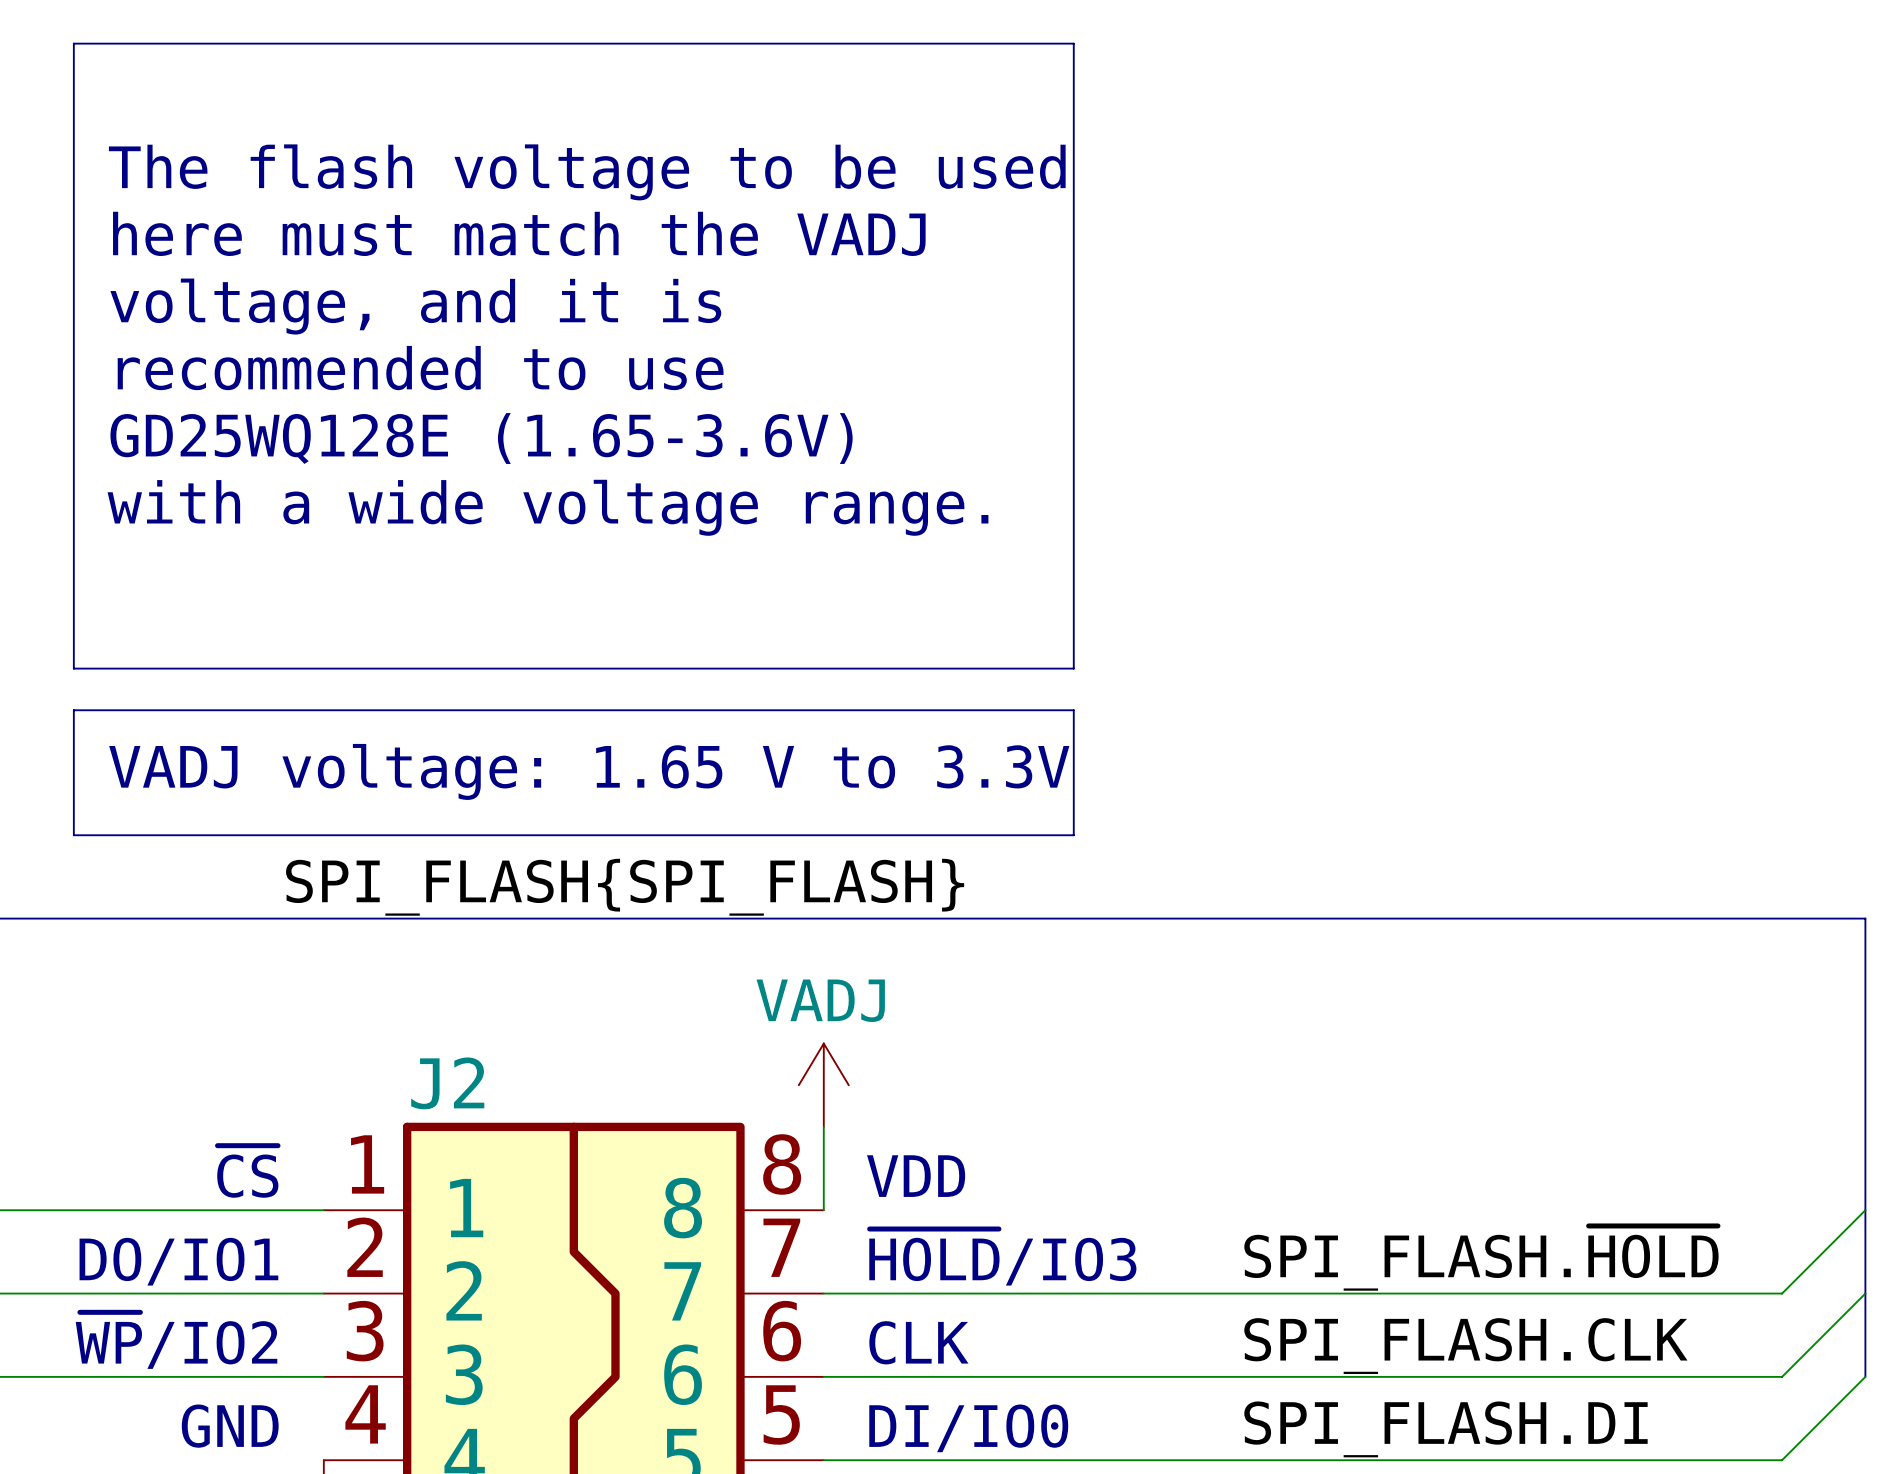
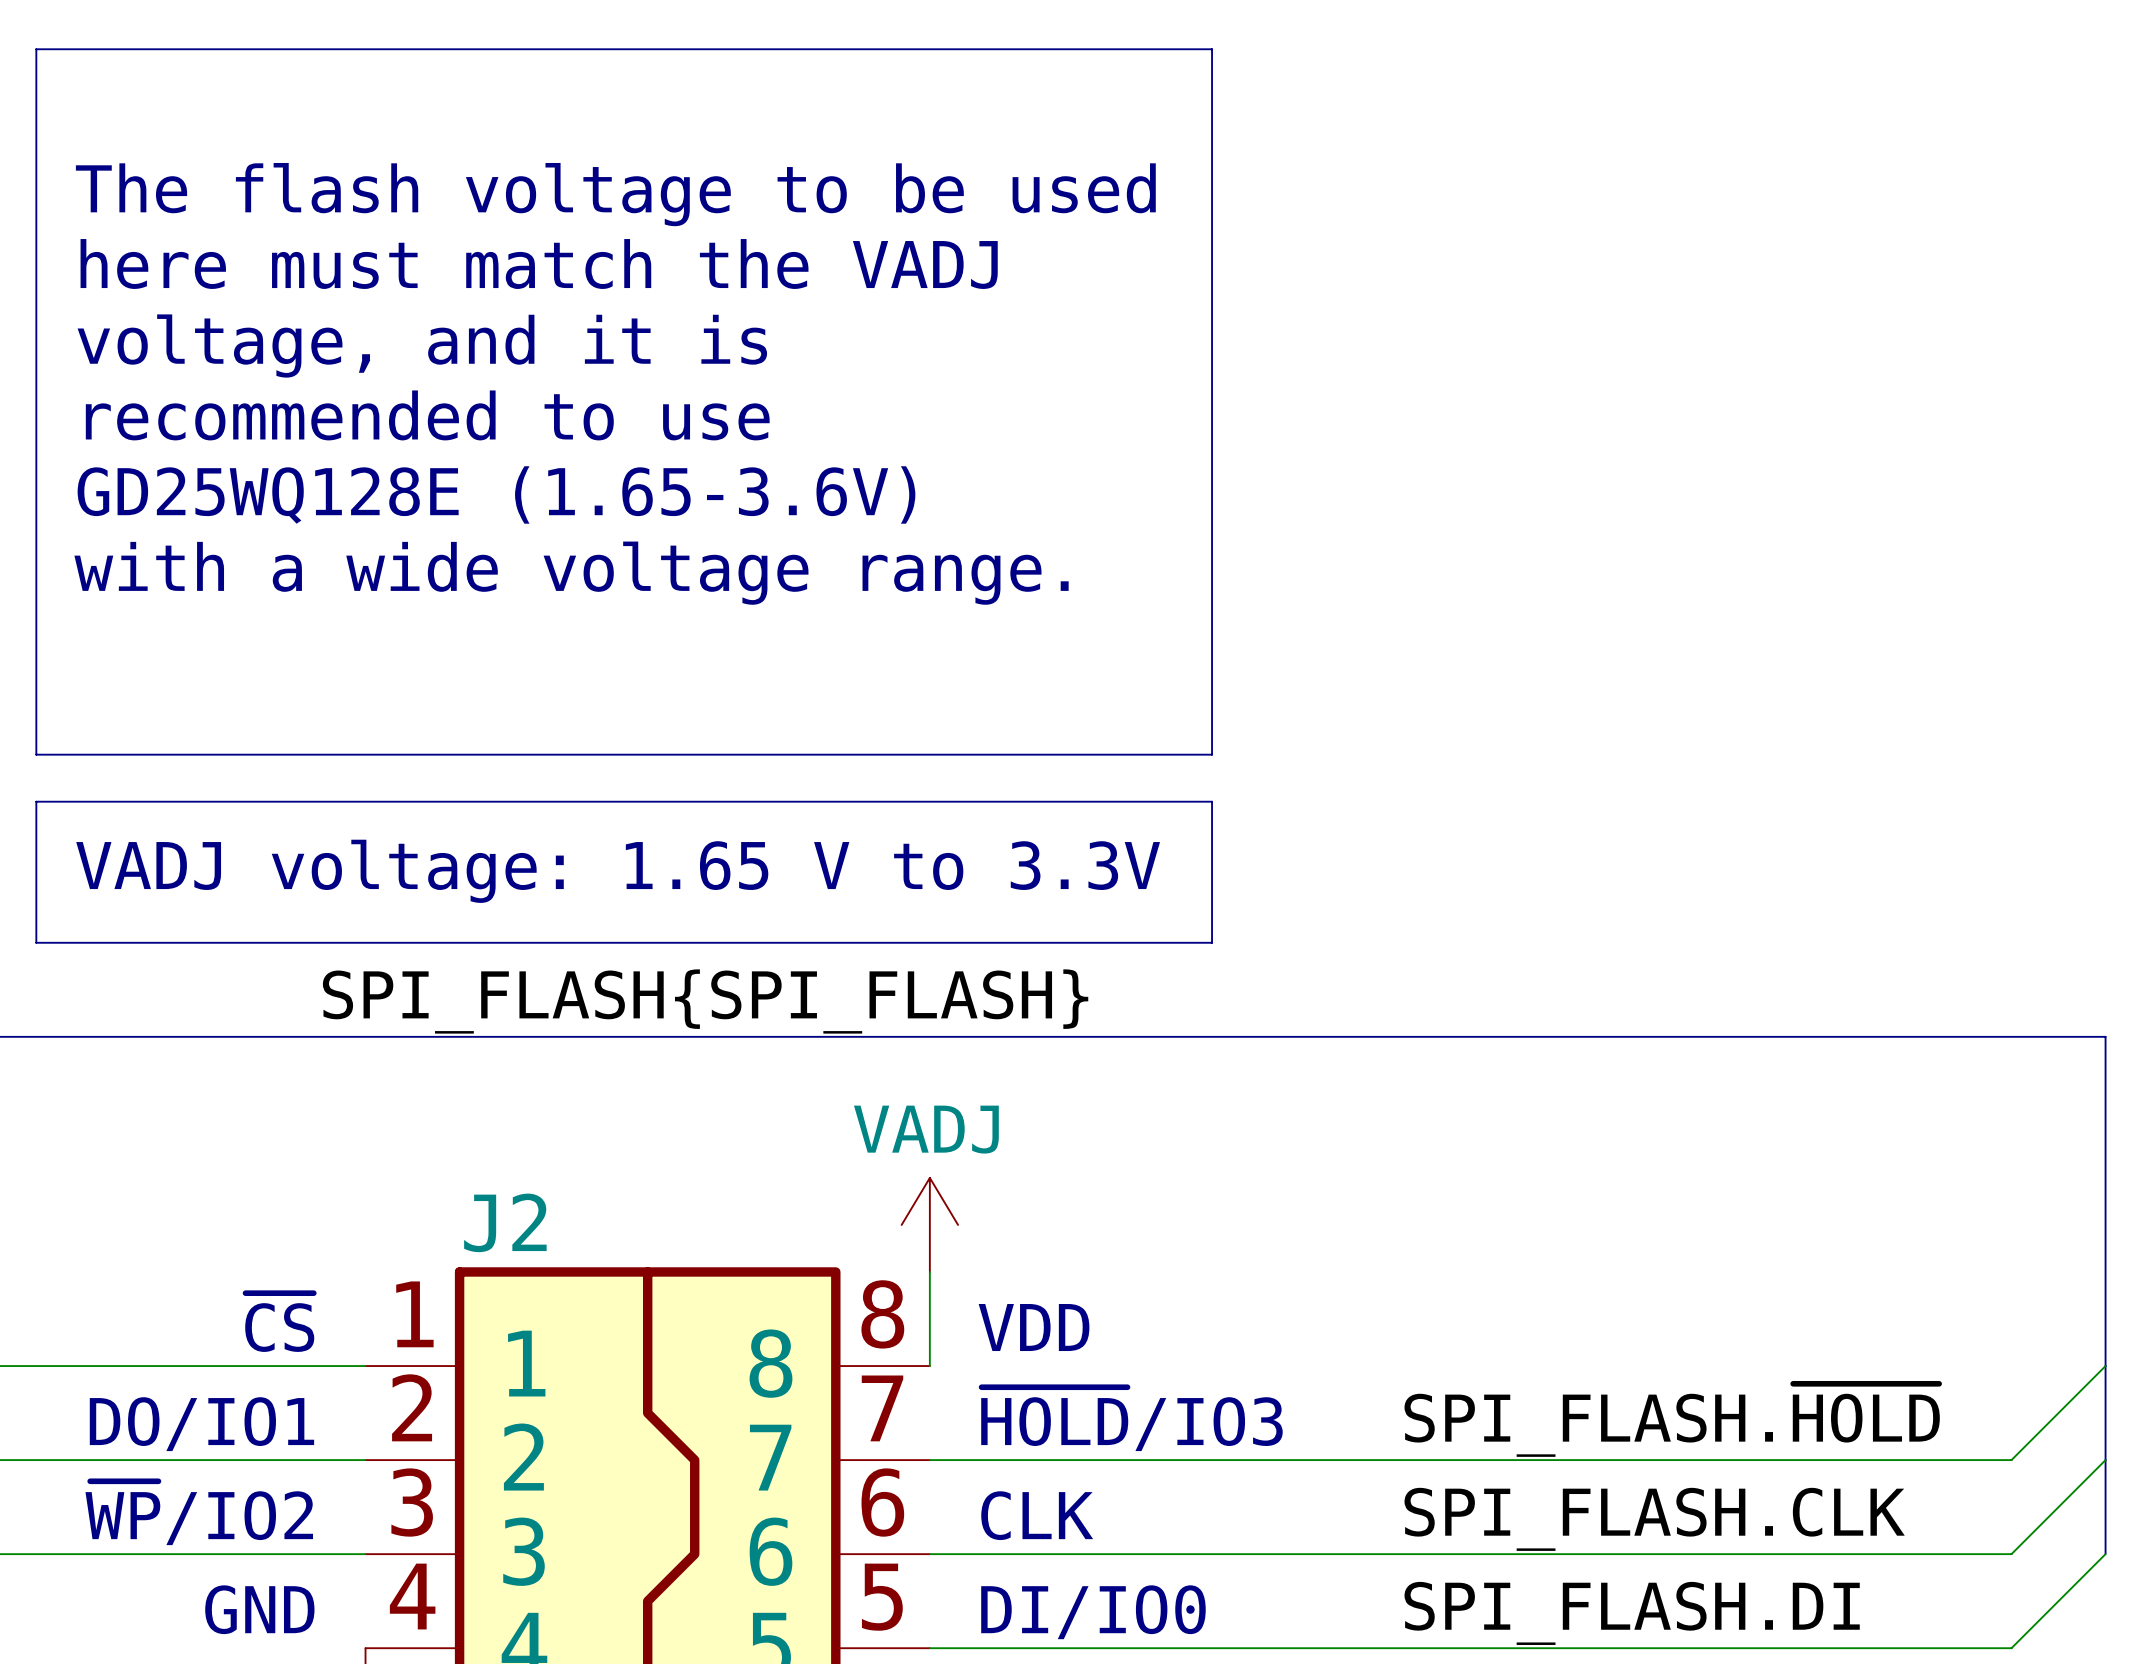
line: (73, 43) (73, 668) -> (83, 49) (36, 49) (36, 754) (83, 754)
text position: The flash voltage to be used (587, 172) -> The flash voltage to be used (615, 194)
text position: here must match the VADJ (519, 233) -> here must match the VADJ (539, 264)
text position: voltage, and it is (415, 306) -> voltage, and it is (422, 346)
text position: recommended to use (420, 368) -> recommended to use (427, 415)
text position: GD25WQ128E (1.65-3.6V) (481, 438) -> GD25WQ128E (1.65-3.6V) (496, 494)
text position: with a wide voltage range. (548, 507) -> with a wide voltage range. (571, 573)
line: (73, 710) (73, 835) -> (83, 801) (36, 801) (36, 942) (83, 942)
text position: VADJ voltage: 1.65 V to 3.3V (589, 771) -> VADJ voltage: 1.65 V to 3.3V (618, 871)

